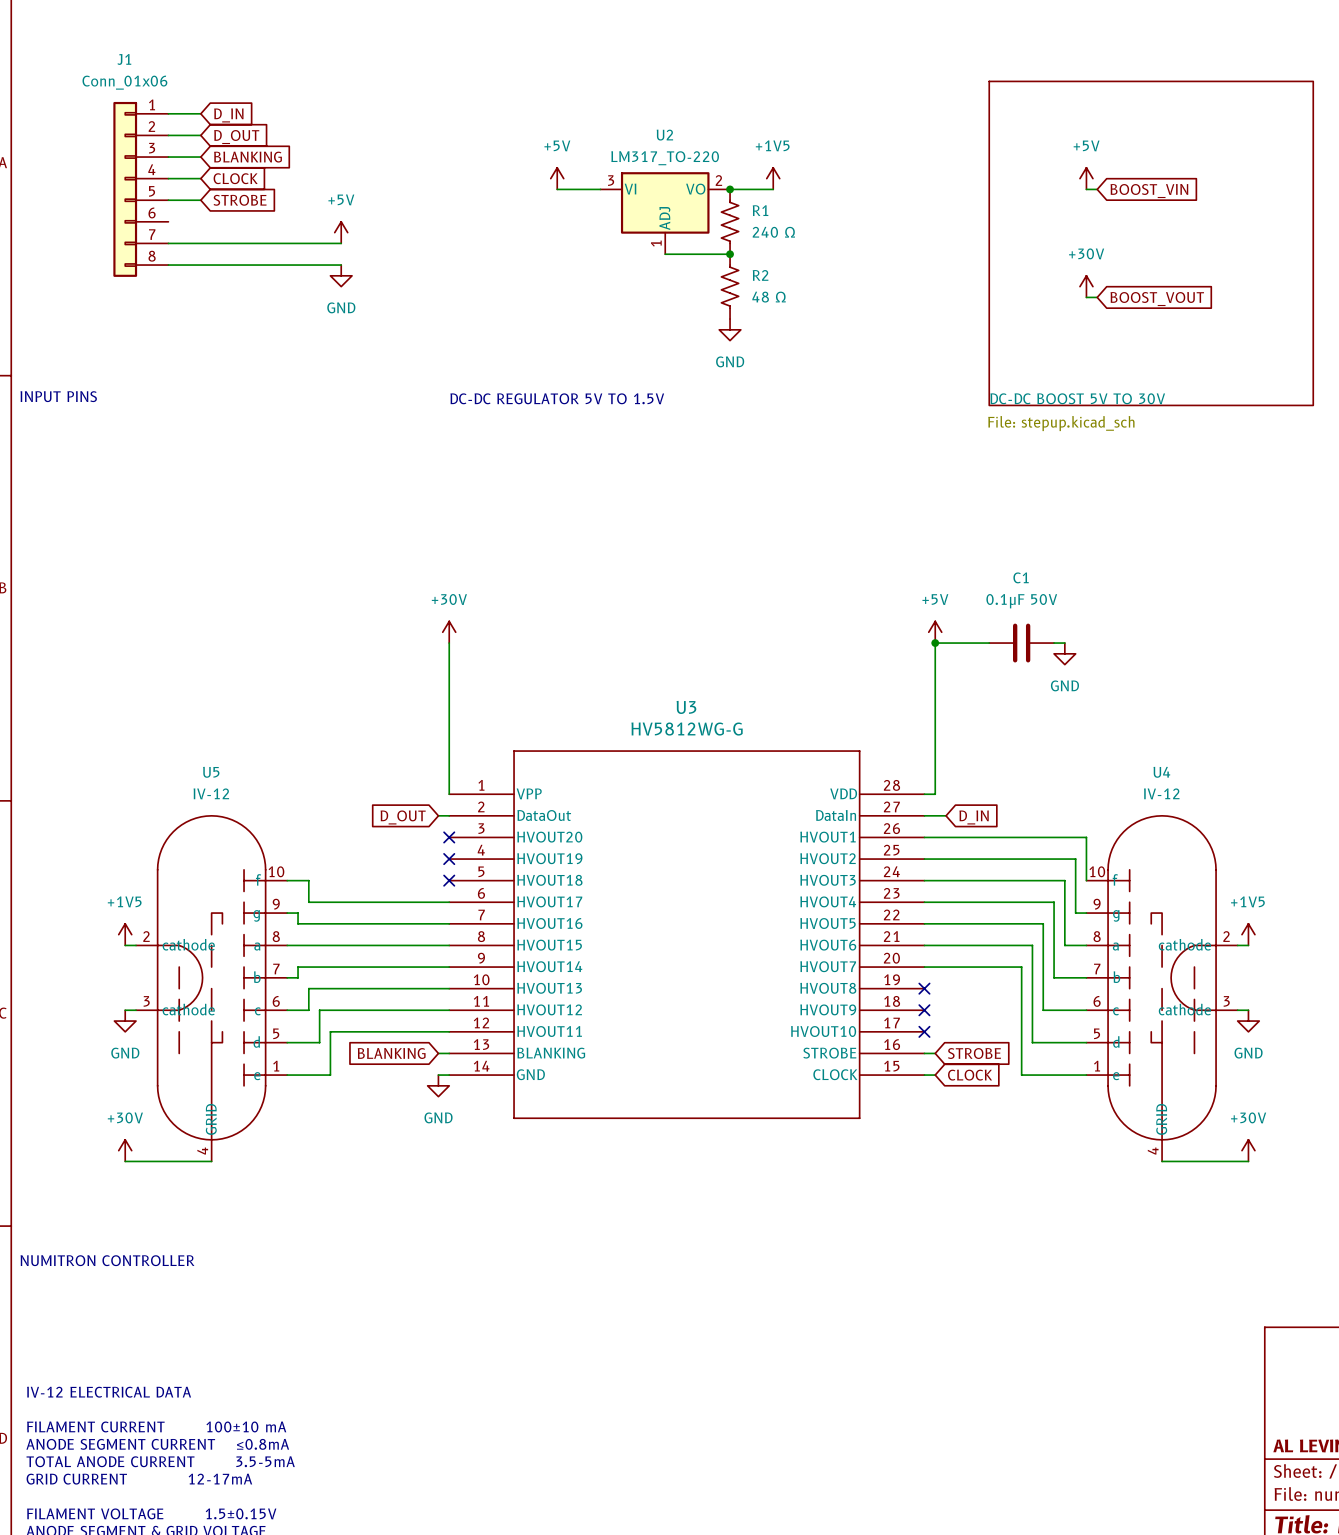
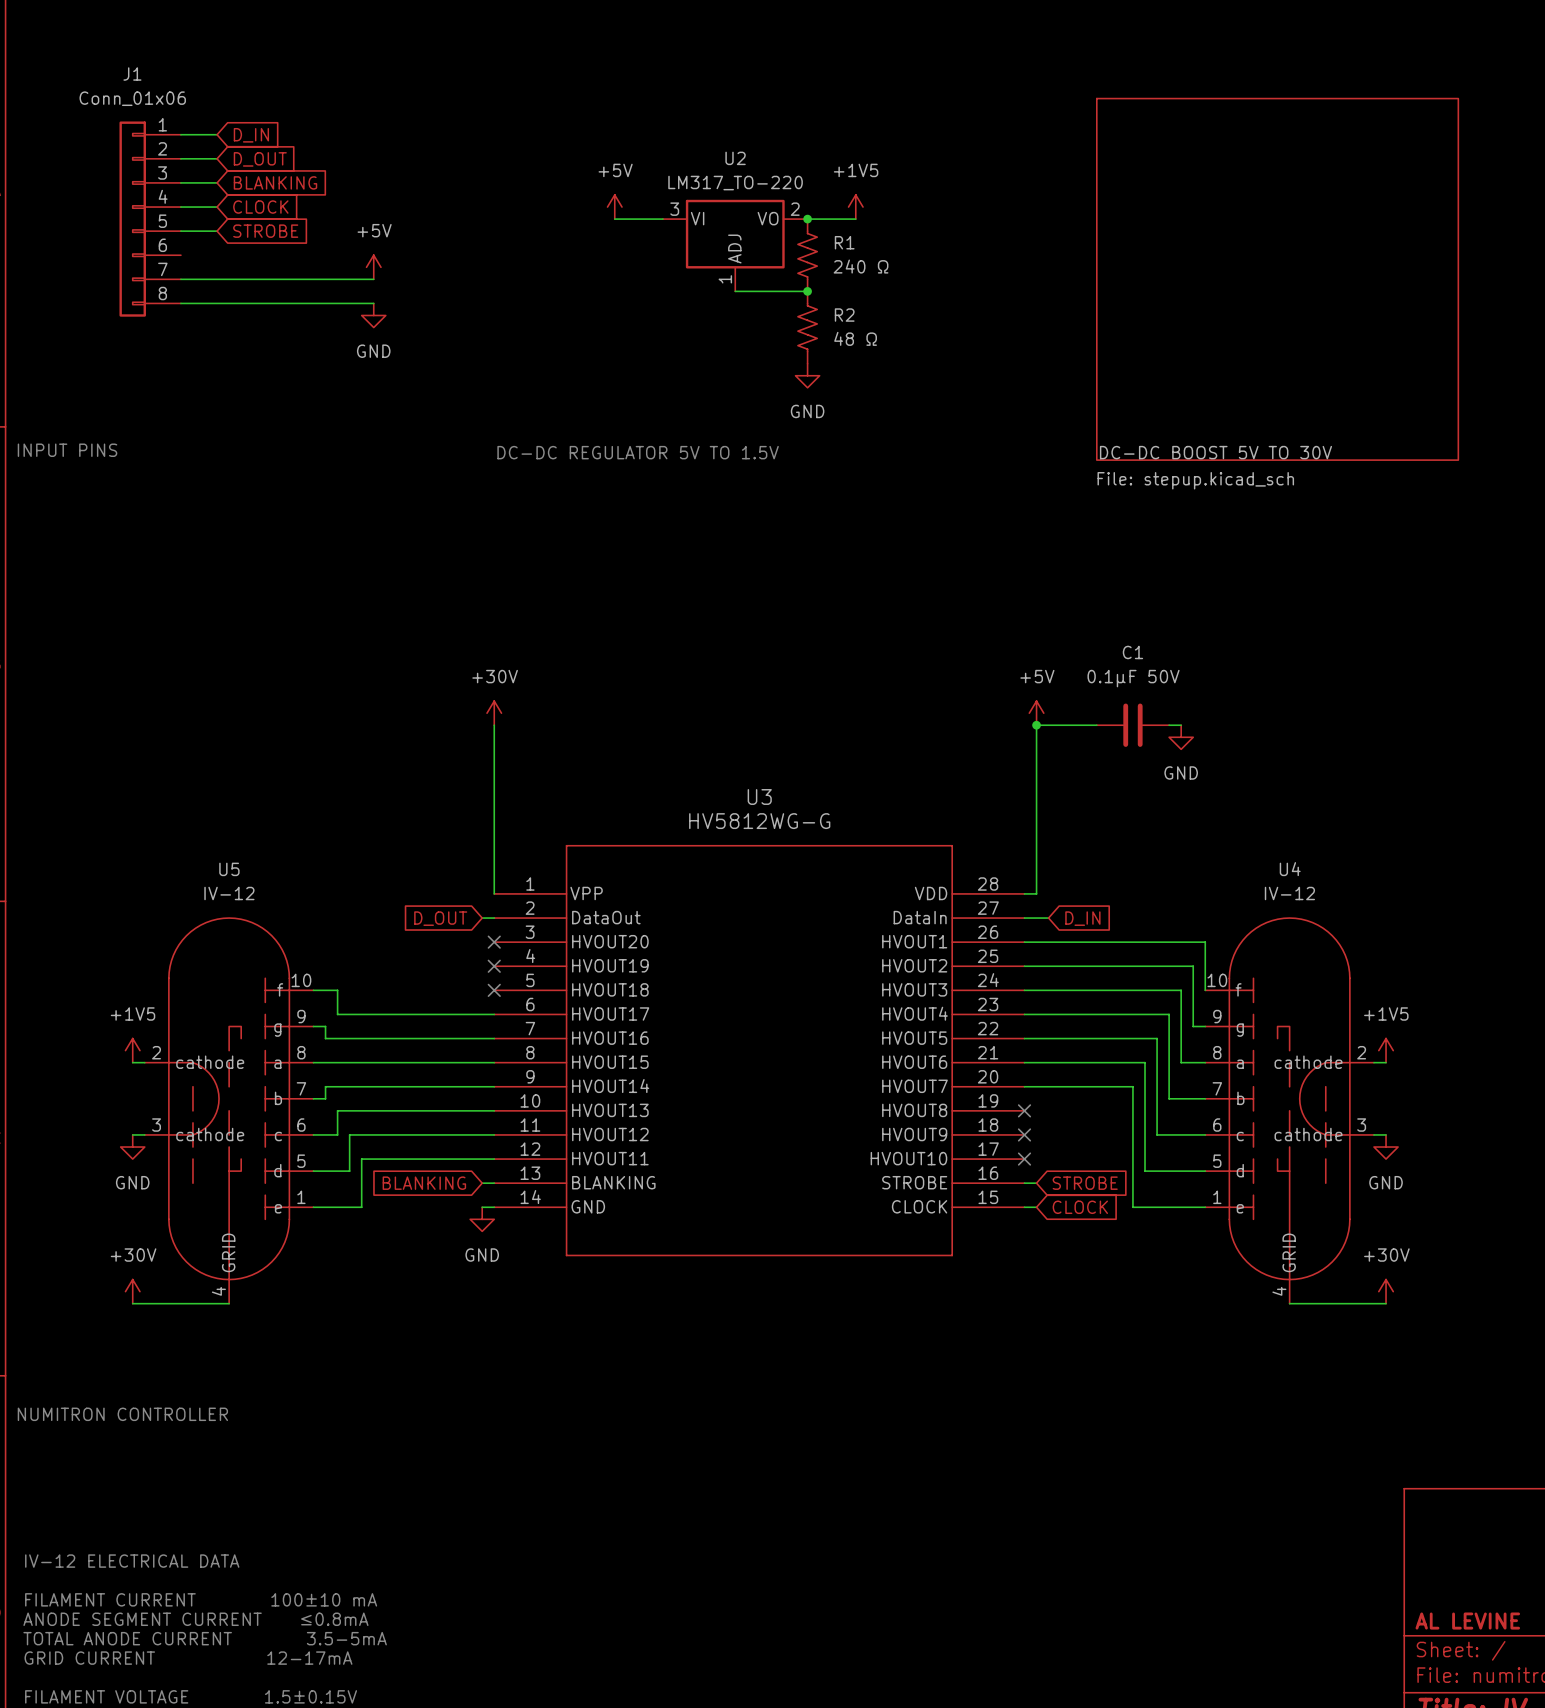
power symbol: +5V (1086, 178) -> none
wire: (1086, 189) (1097, 189) -> none
global label: BOOST_VIN (1149, 191) -> none
power symbol: +30V (1086, 286) -> none
wire: (1086, 297) (1097, 297) -> none
global label: BOOST_VOUT (1157, 299) -> none

